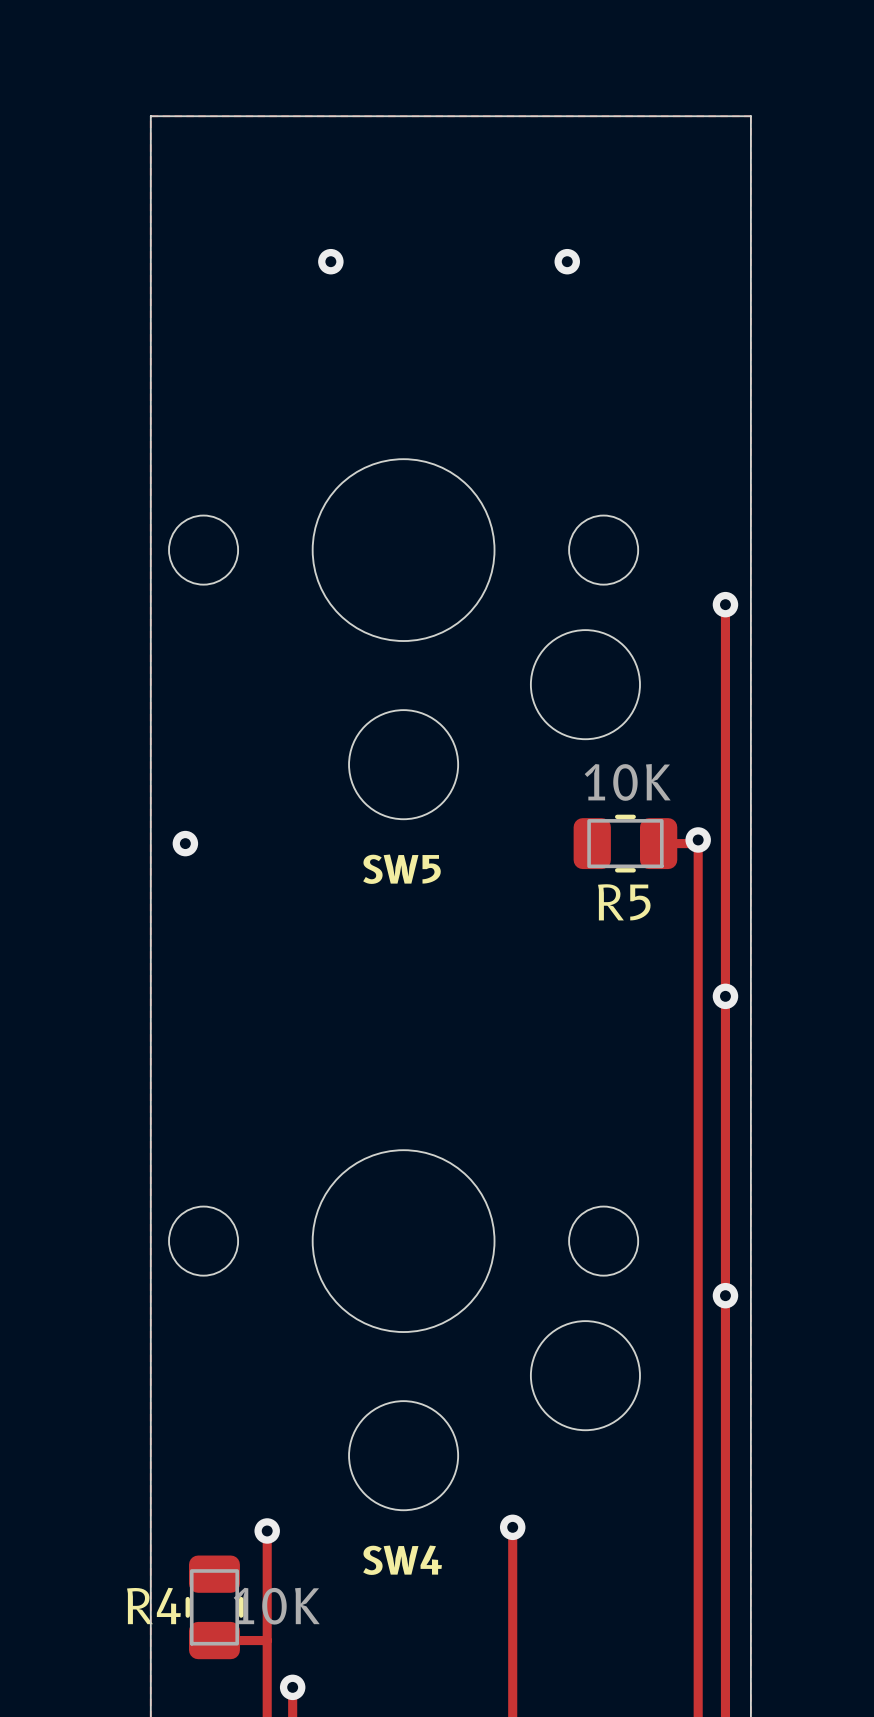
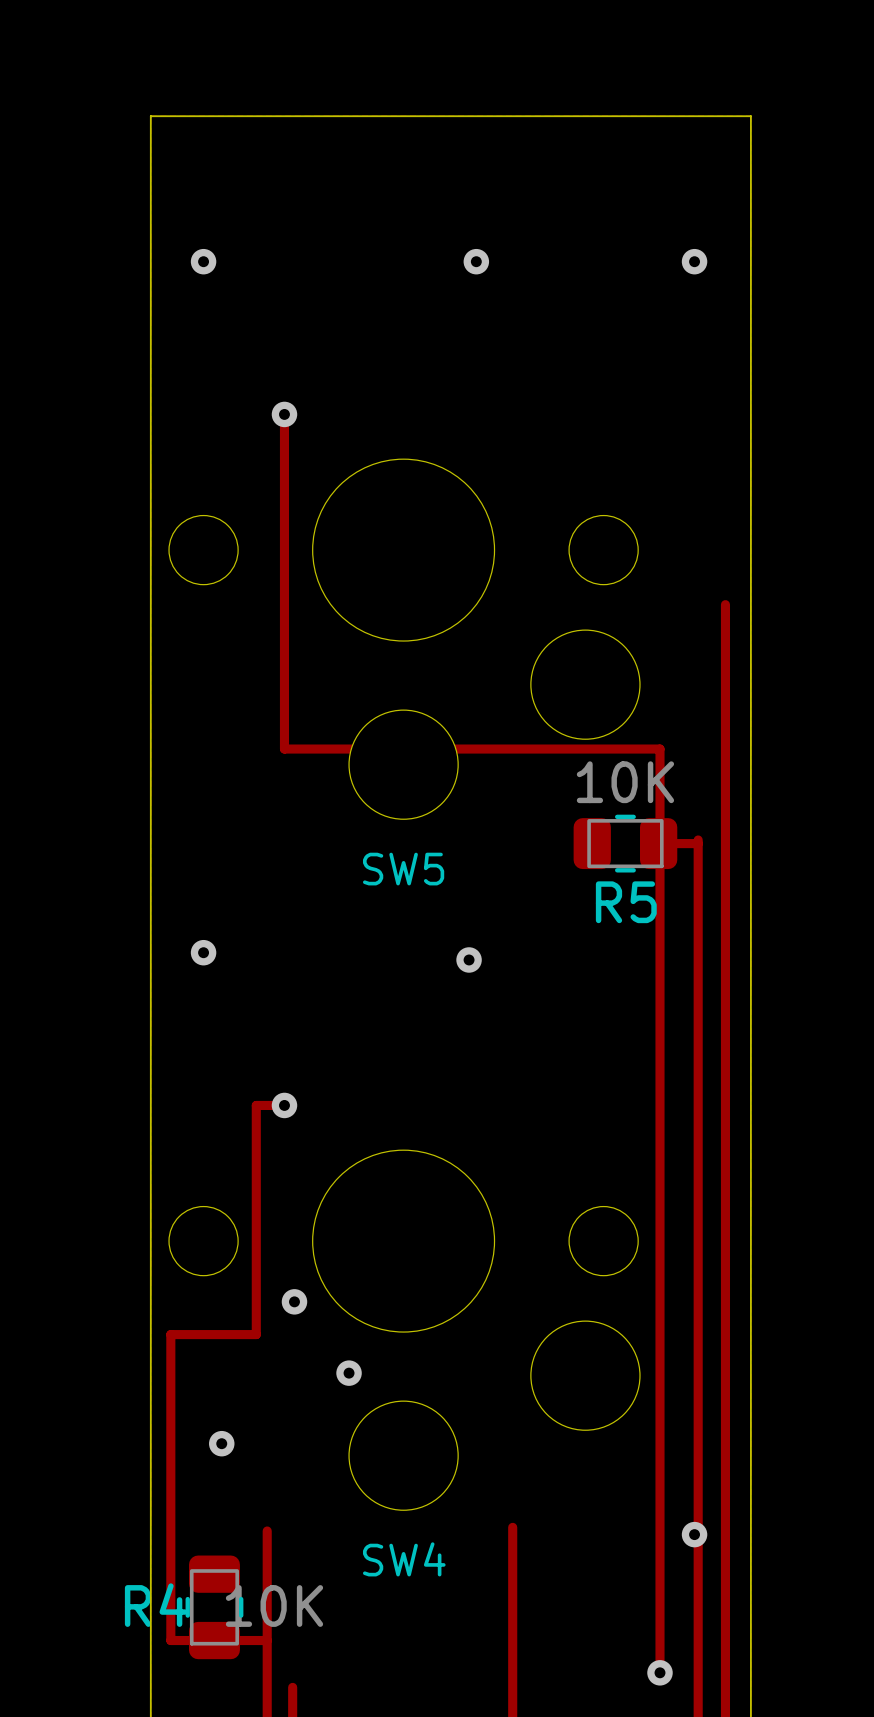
via: none -> (203, 261)
via: (330, 261) -> none
via: none -> (476, 261)
via: (567, 261) -> none
via: none -> (694, 261)
track: none -> (284, 414) (284, 749) (659, 749) (659, 1672)
via: none -> (284, 414)
via: (725, 604) -> none
via: (698, 839) -> none
via position: (185, 843) -> (203, 952)
via: none -> (469, 959)
via: (725, 996) -> none
track: none -> (284, 1105) (256, 1105) (256, 1334) (170, 1334) (170, 1640) (214, 1640)
via: none -> (284, 1105)
via: (725, 1295) -> none
via: none -> (294, 1301)
via: none -> (349, 1373)
via: none -> (221, 1443)
via: (512, 1527) -> none
via: (267, 1530) -> none
via: none -> (694, 1534)
via: none -> (659, 1672)
via: (292, 1687) -> none

